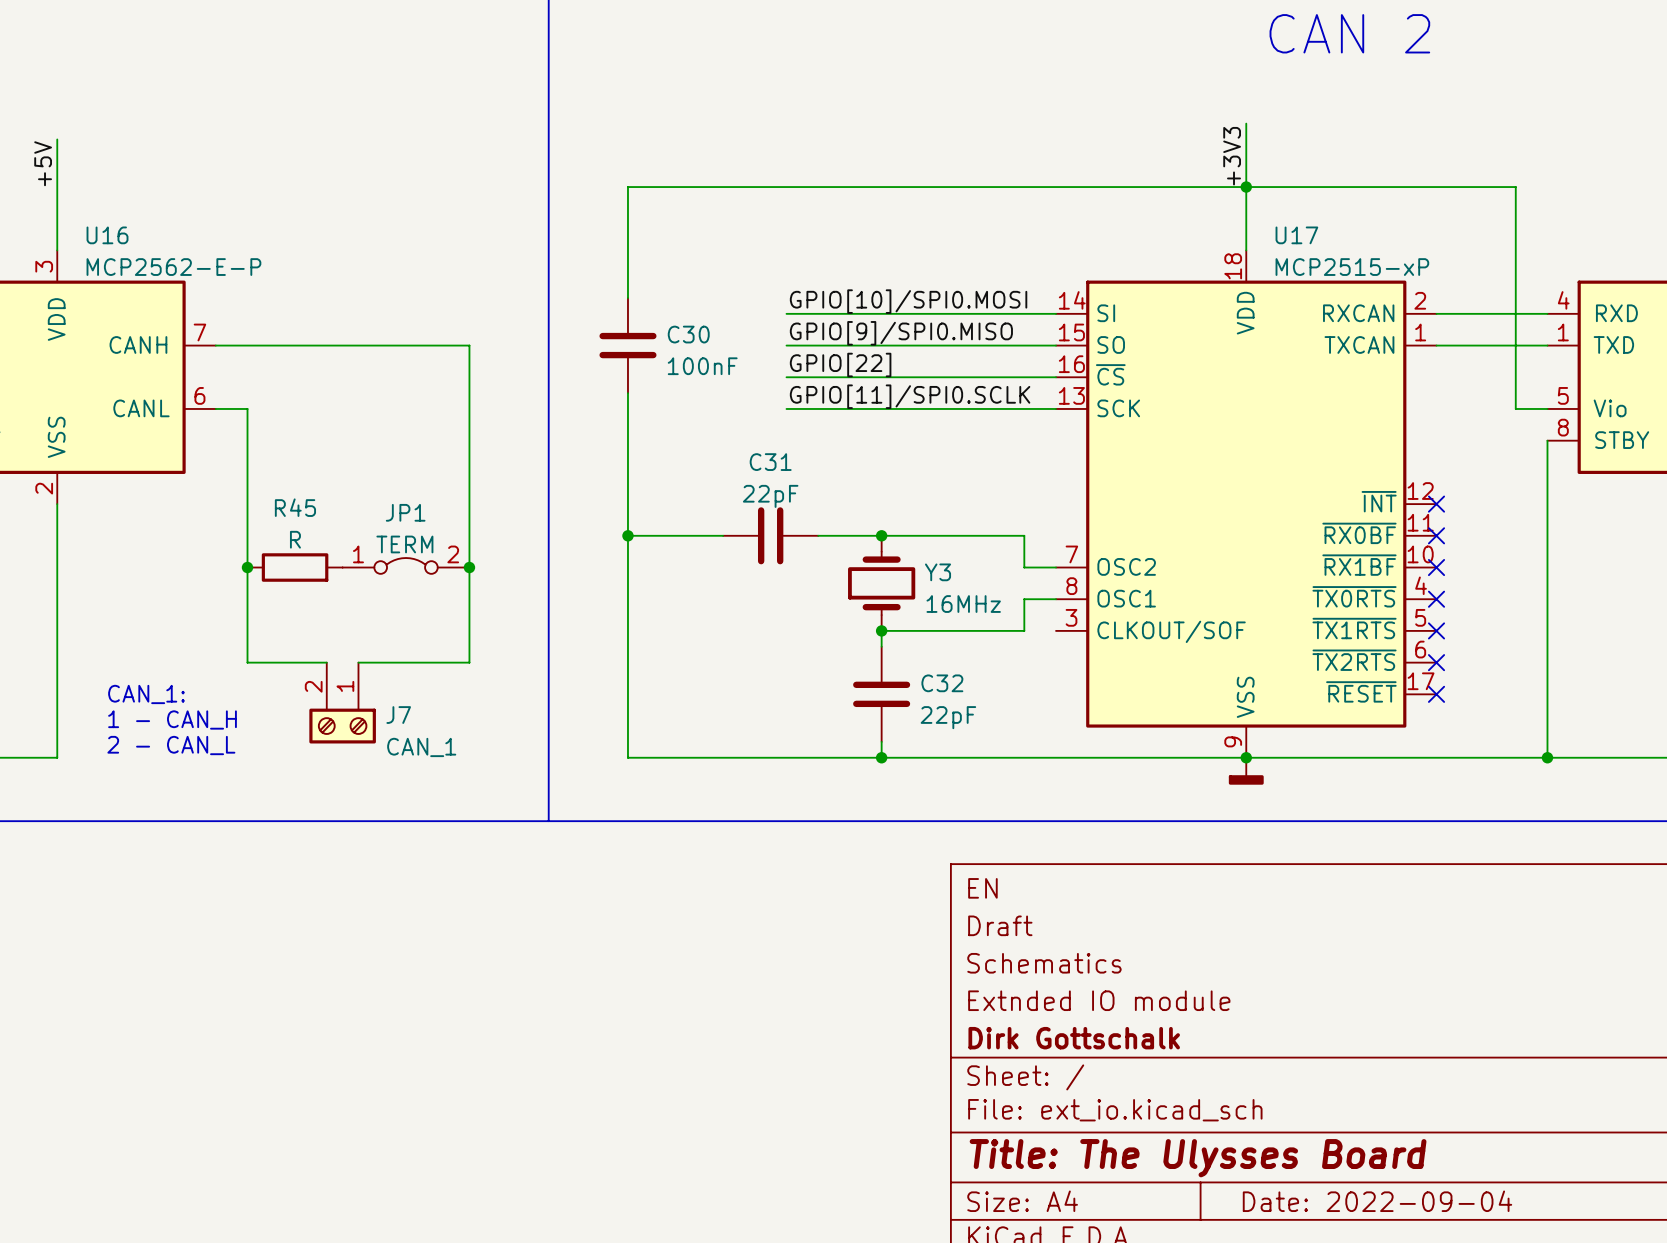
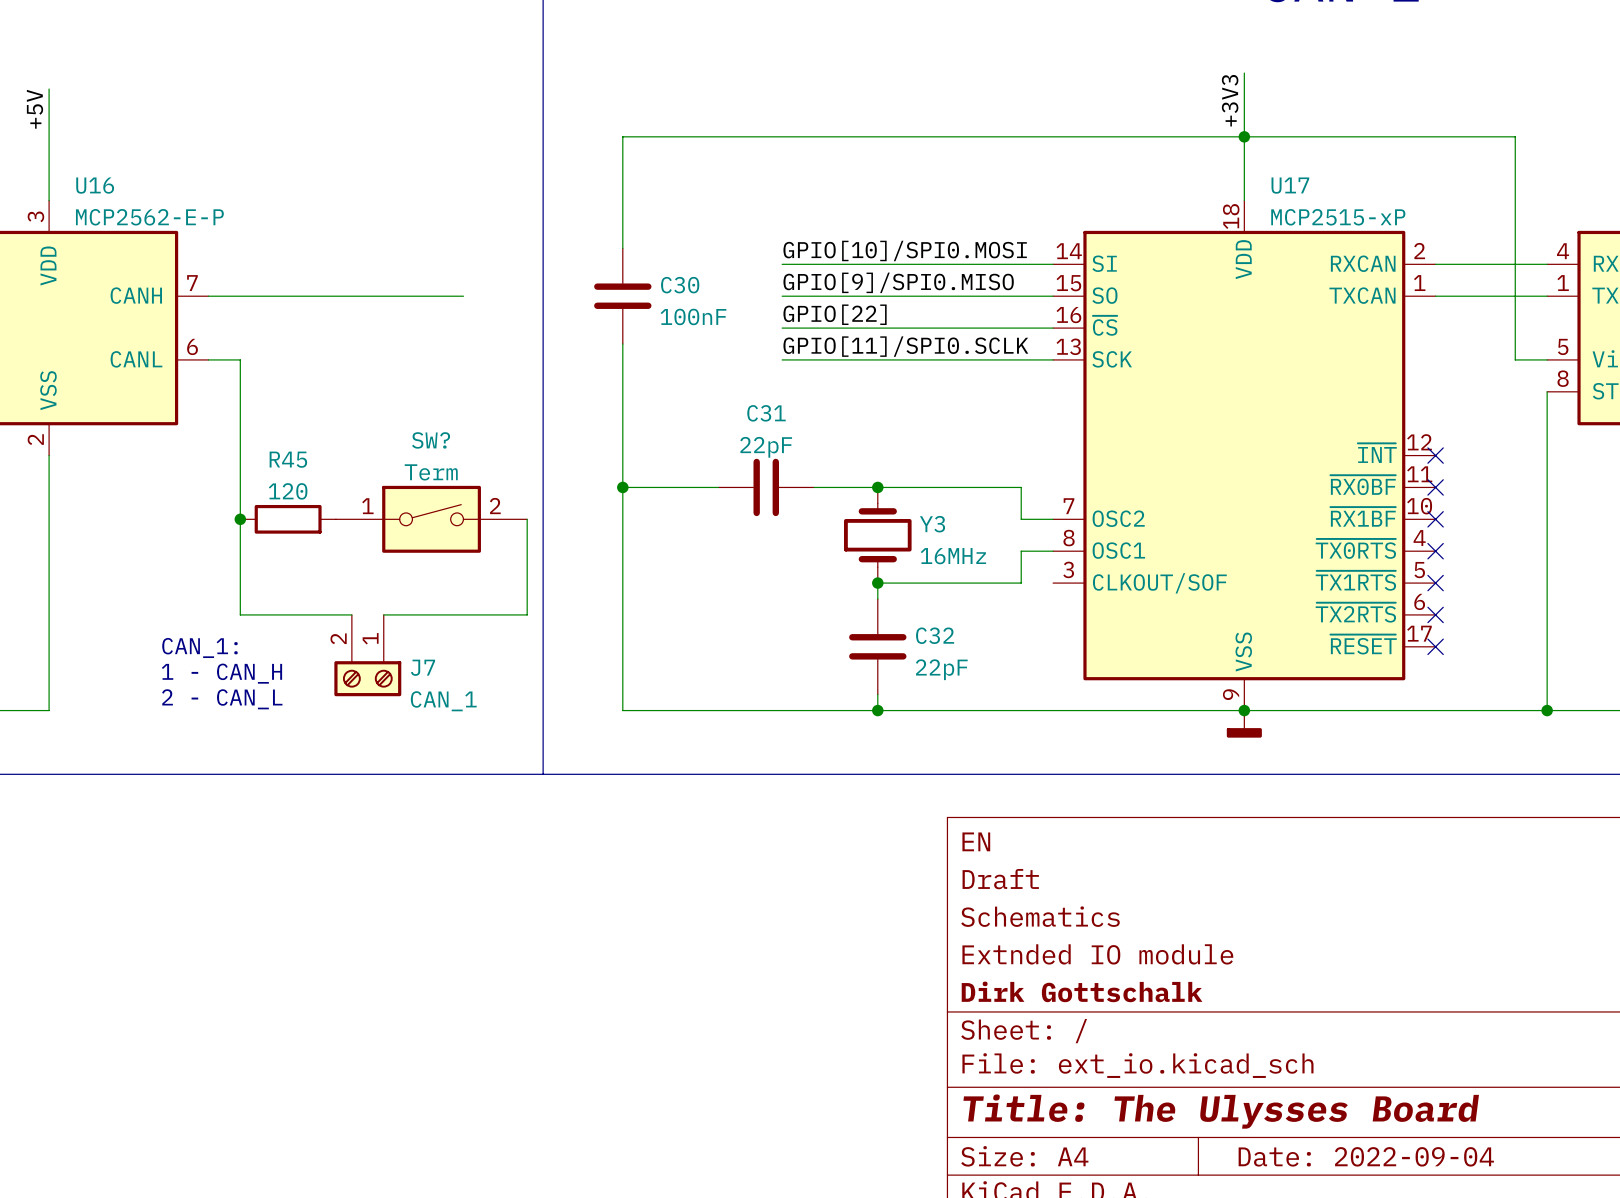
wire: (469, 345) (469, 662) -> (527, 519) (527, 614) (463, 614)
R45 value: R (295, 539) -> 120 (288, 491)
JP1: TERM (406, 565) -> none
SW?: none -> Term (431, 519)
junction: (469, 567) -> none
wire: (358, 662) (390, 662) -> (351, 614) (320, 614)
text position: CAN_1: (146, 694) -> CAN_1: (199, 647)
J7 position: (342, 703) -> (367, 655)
text position: 1 - CAN_H (172, 720) -> 1 - CAN_H (221, 673)
text position: 2 - CAN_L (171, 745) -> 2 - CAN_L (222, 699)

